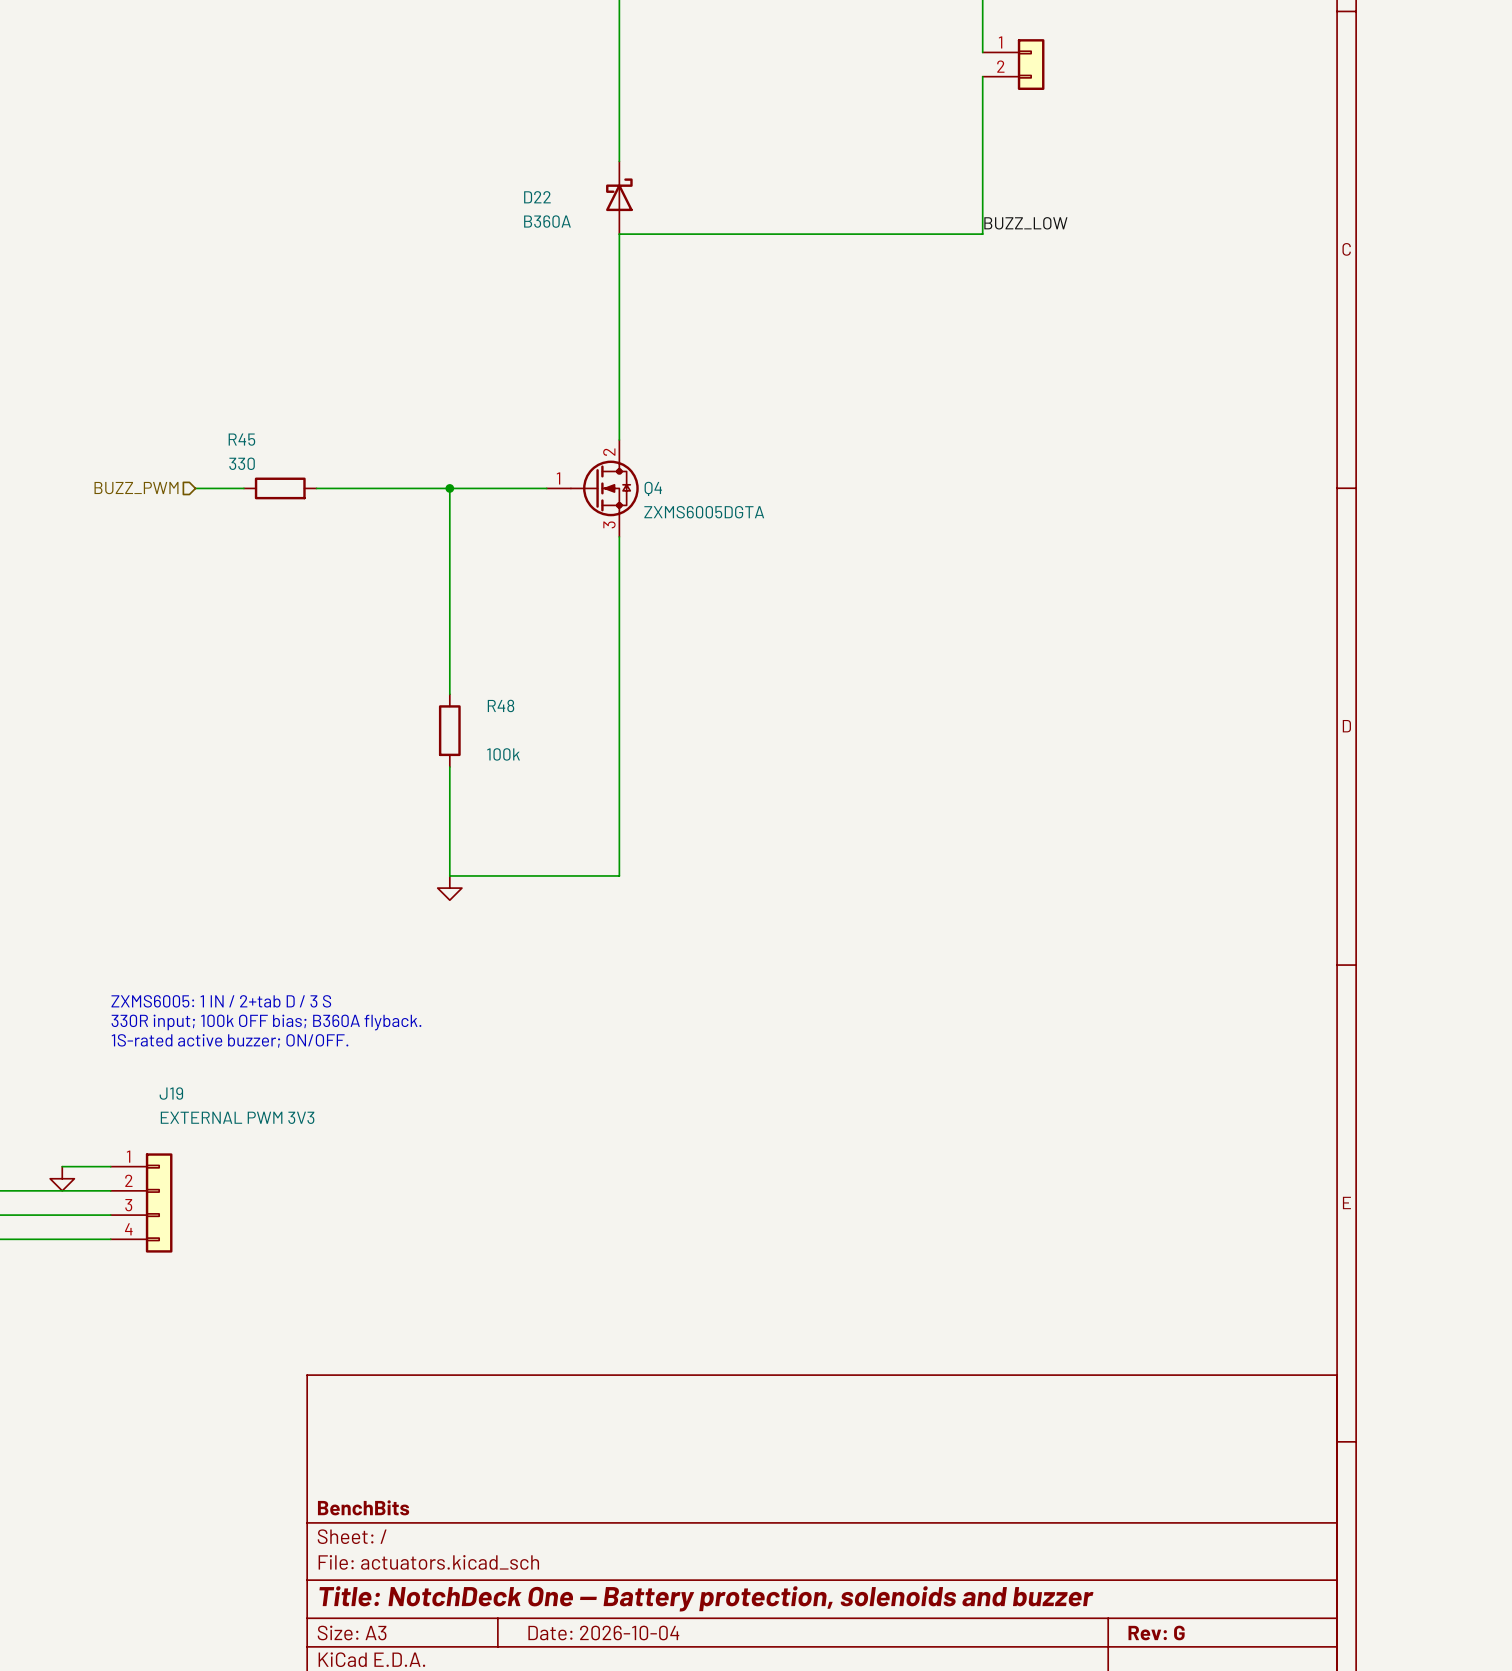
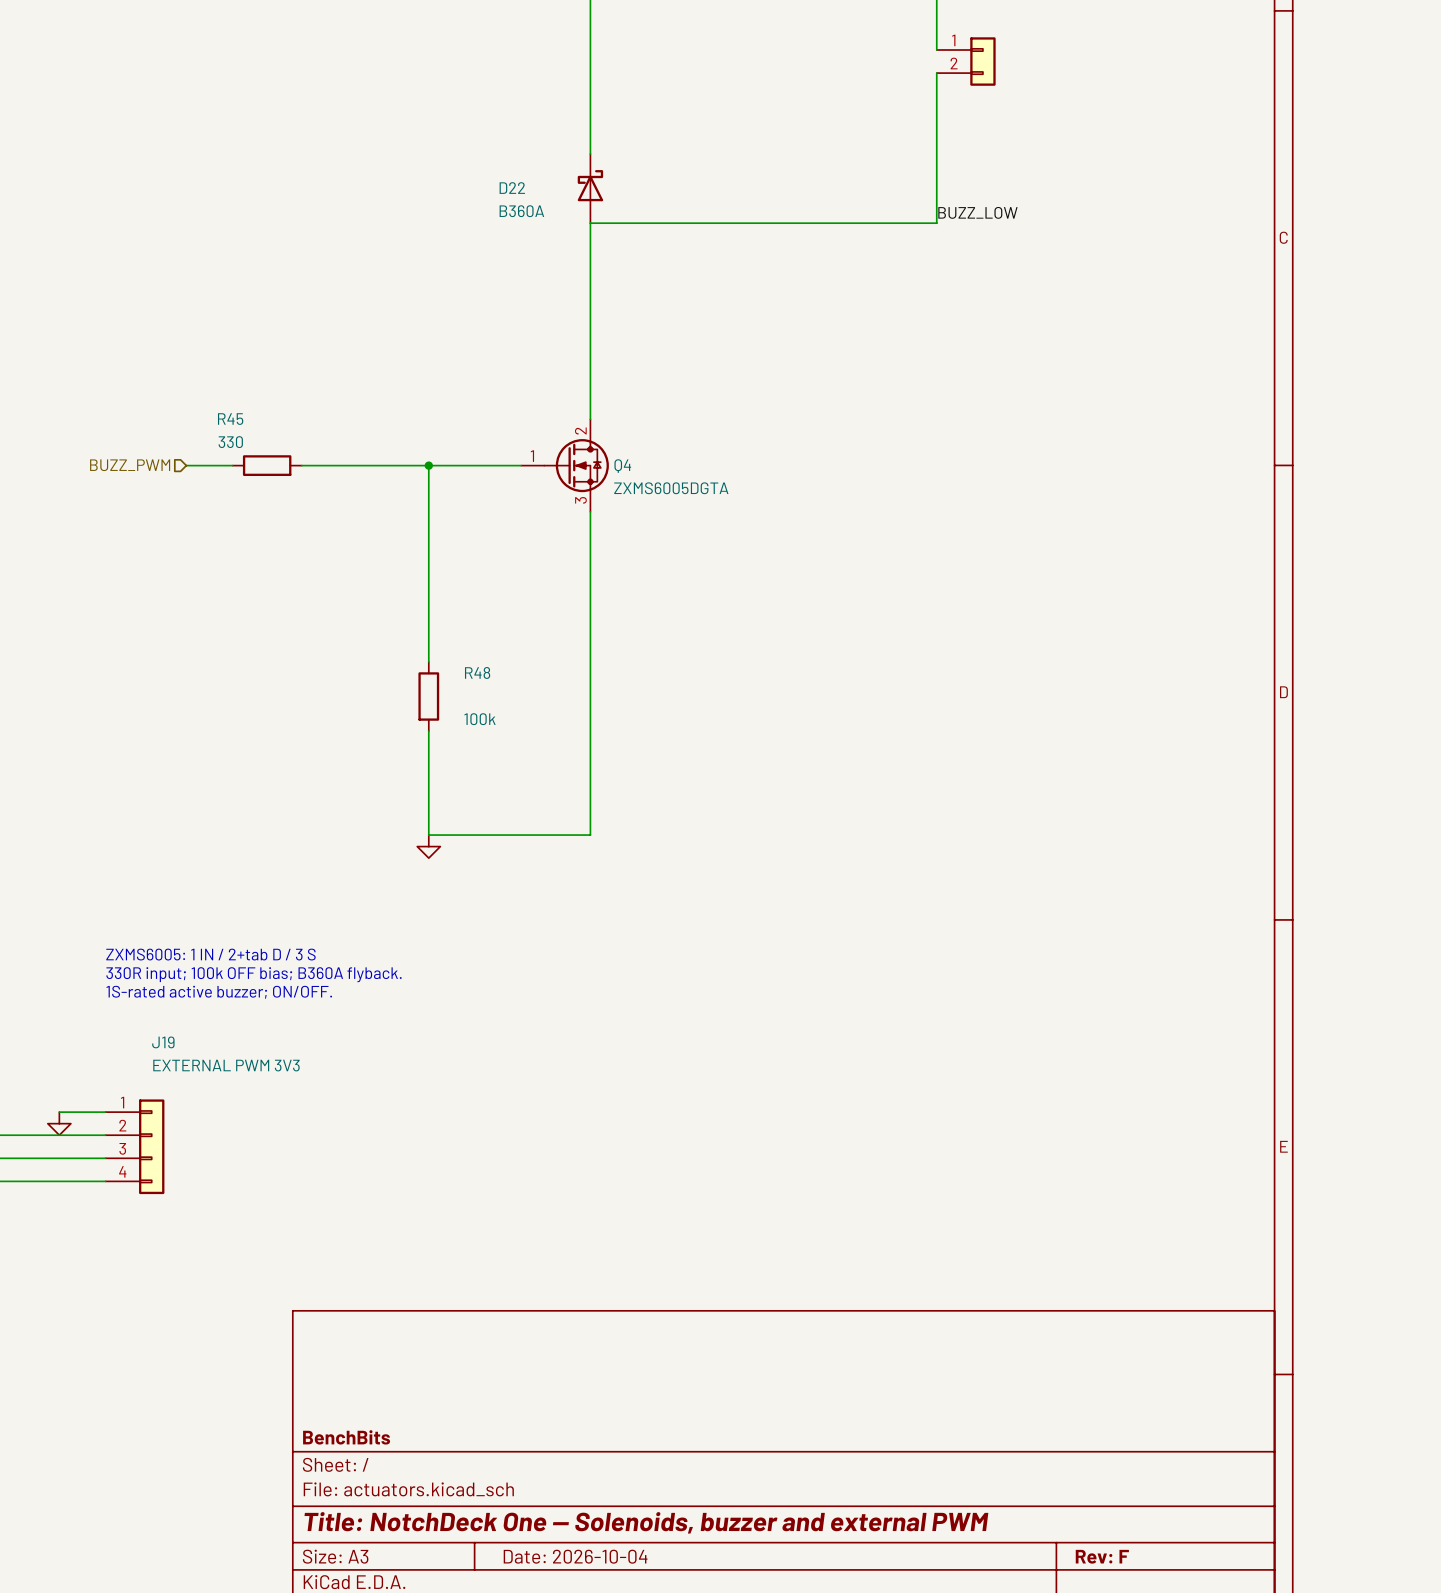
title block: Title: NotchDeck One — Battery protection, solenoids and buzzer (706, 1598) -> Title: NotchDeck One — Solenoids, buzzer and external PWM (646, 1522)
title block: Rev: G (1156, 1632) -> Rev: F (1102, 1556)

